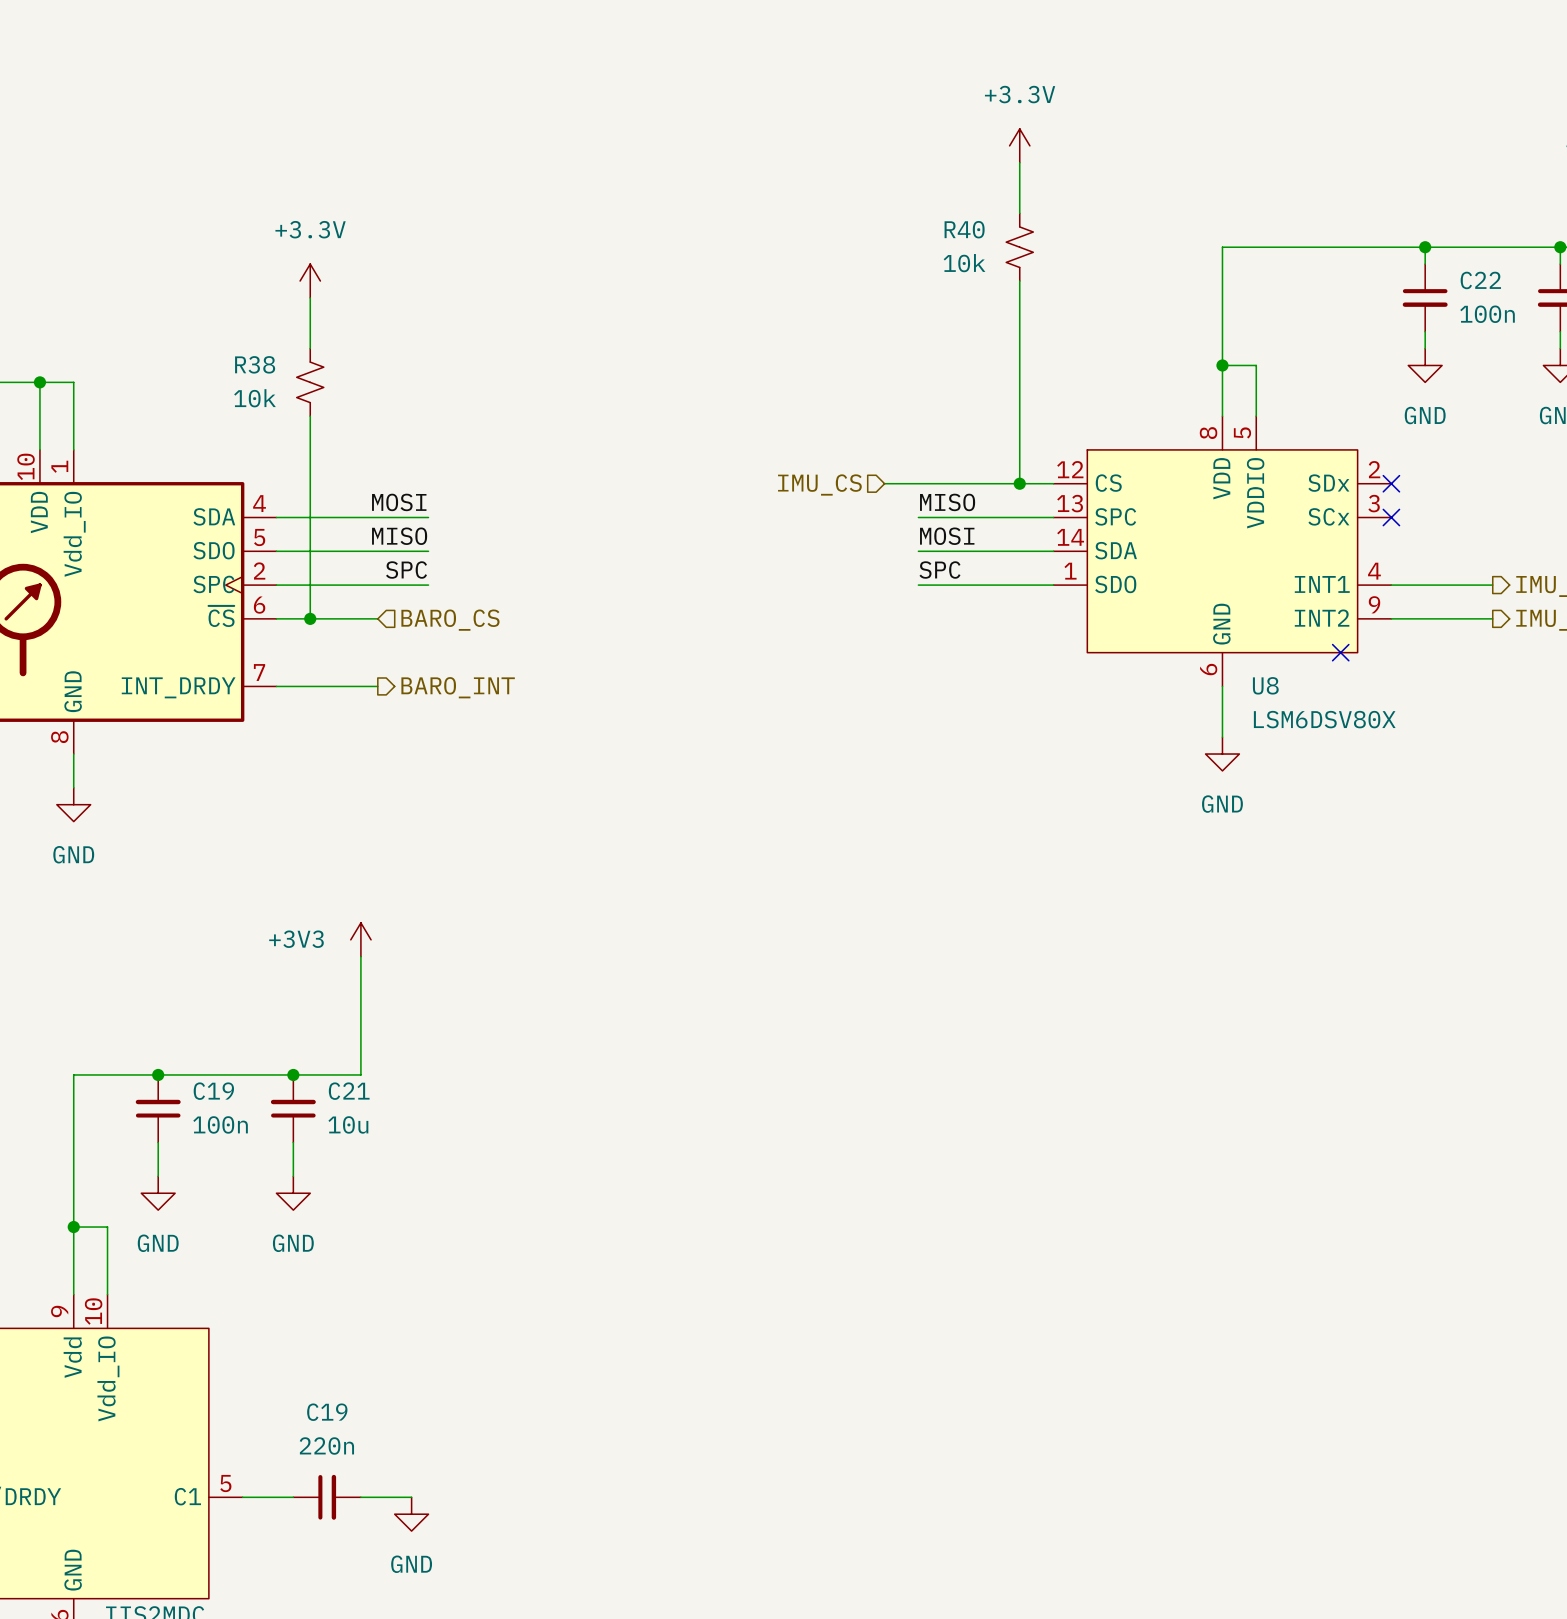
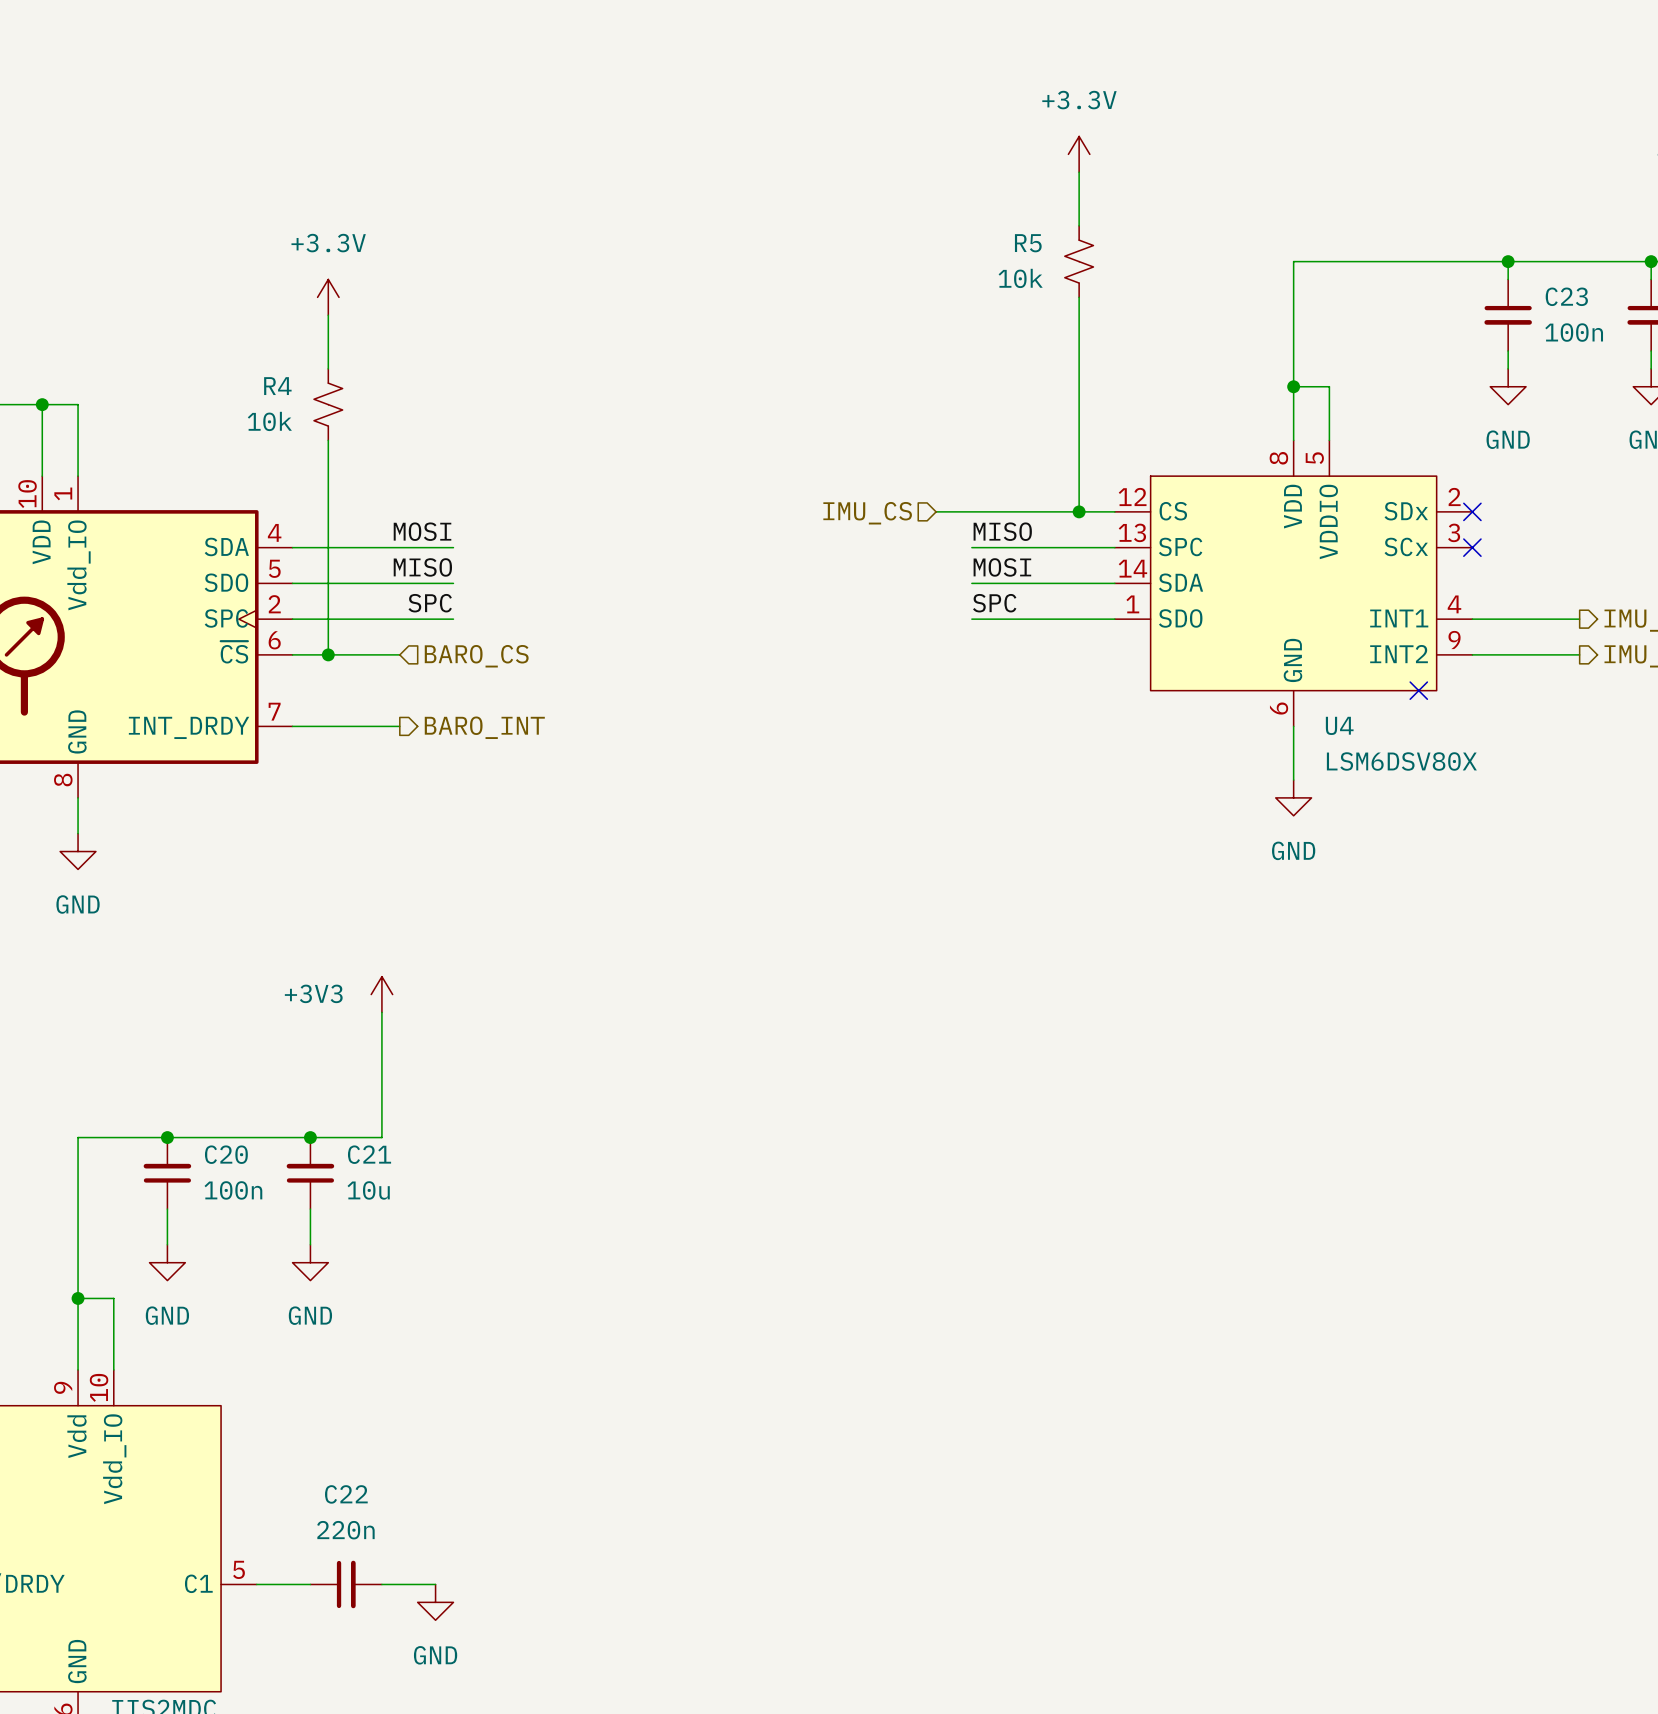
R40 name: R40 (964, 229) -> R5 (1028, 243)
C22 name: C22 (1480, 280) -> C23 (1566, 296)
R38 name: R38 (255, 364) -> R4 (277, 386)
U8 name: U8 (1265, 685) -> U4 (1339, 725)
C19 name: C19 (213, 1091) -> C20 (226, 1154)
C19 name: C19 (327, 1412) -> C22 (346, 1494)

